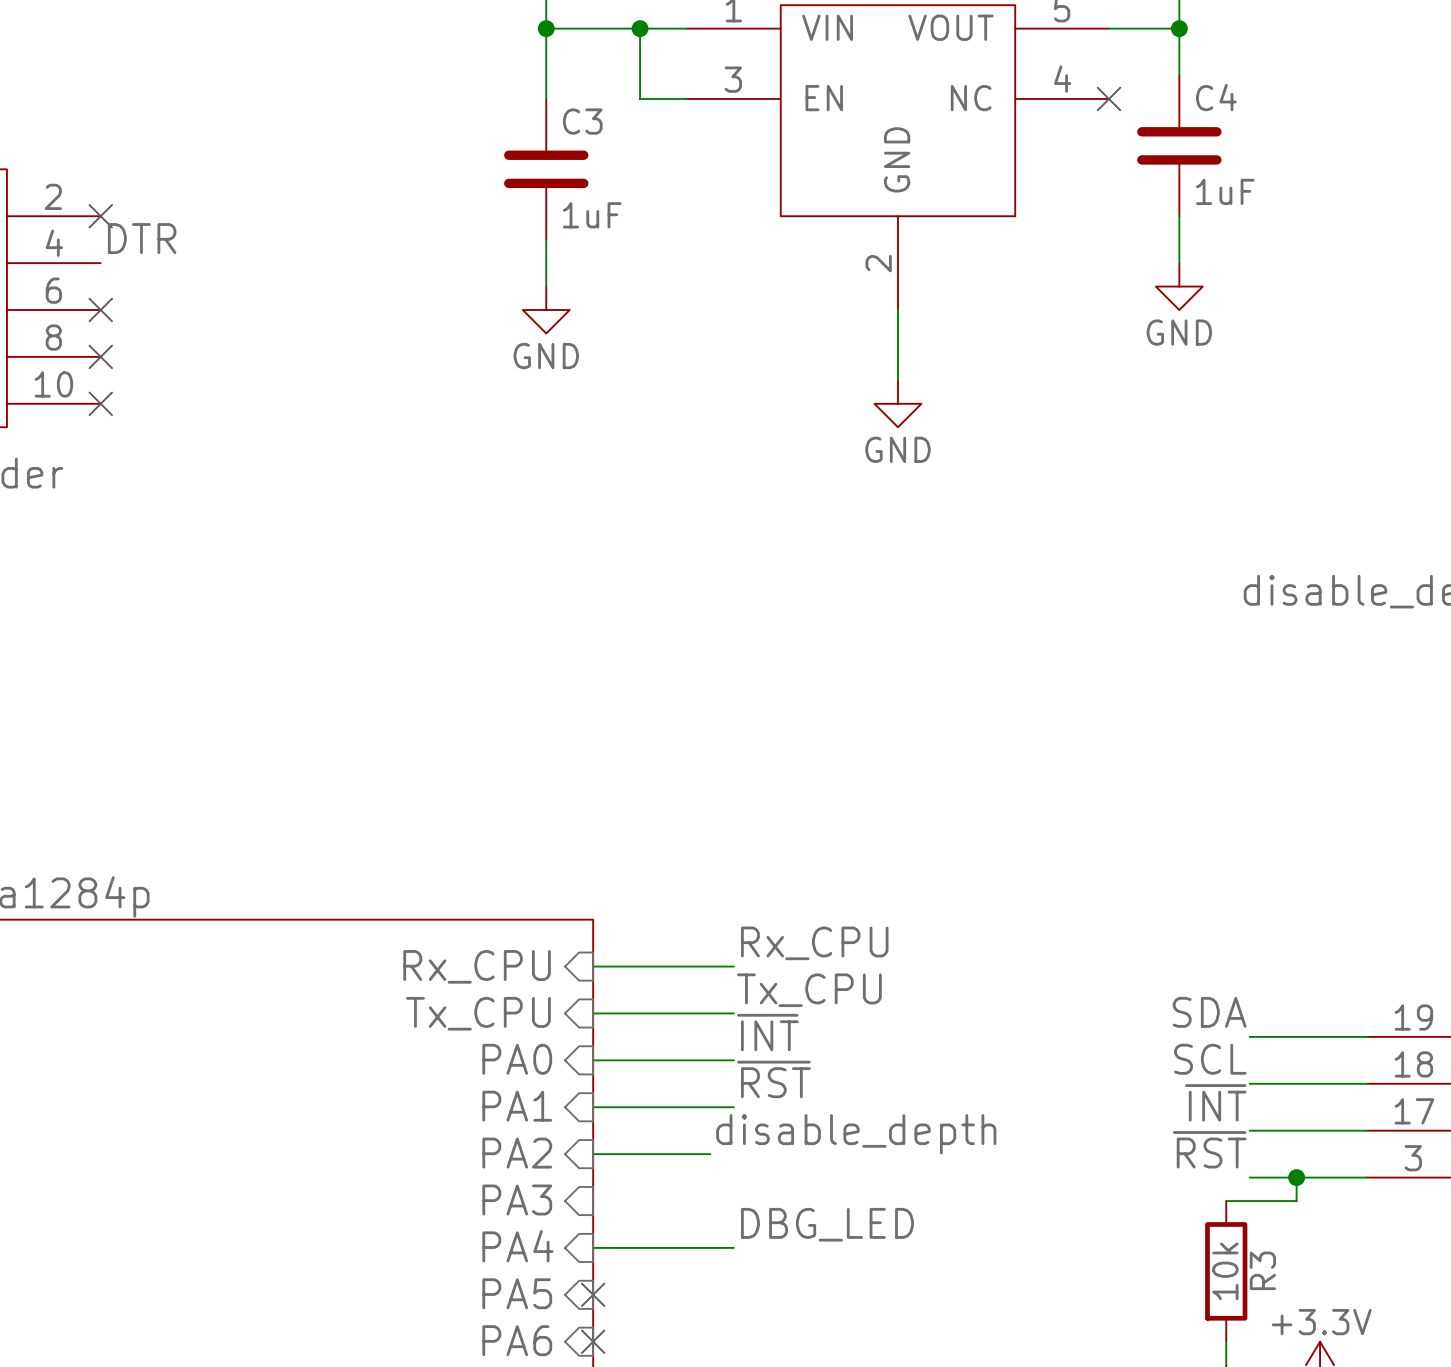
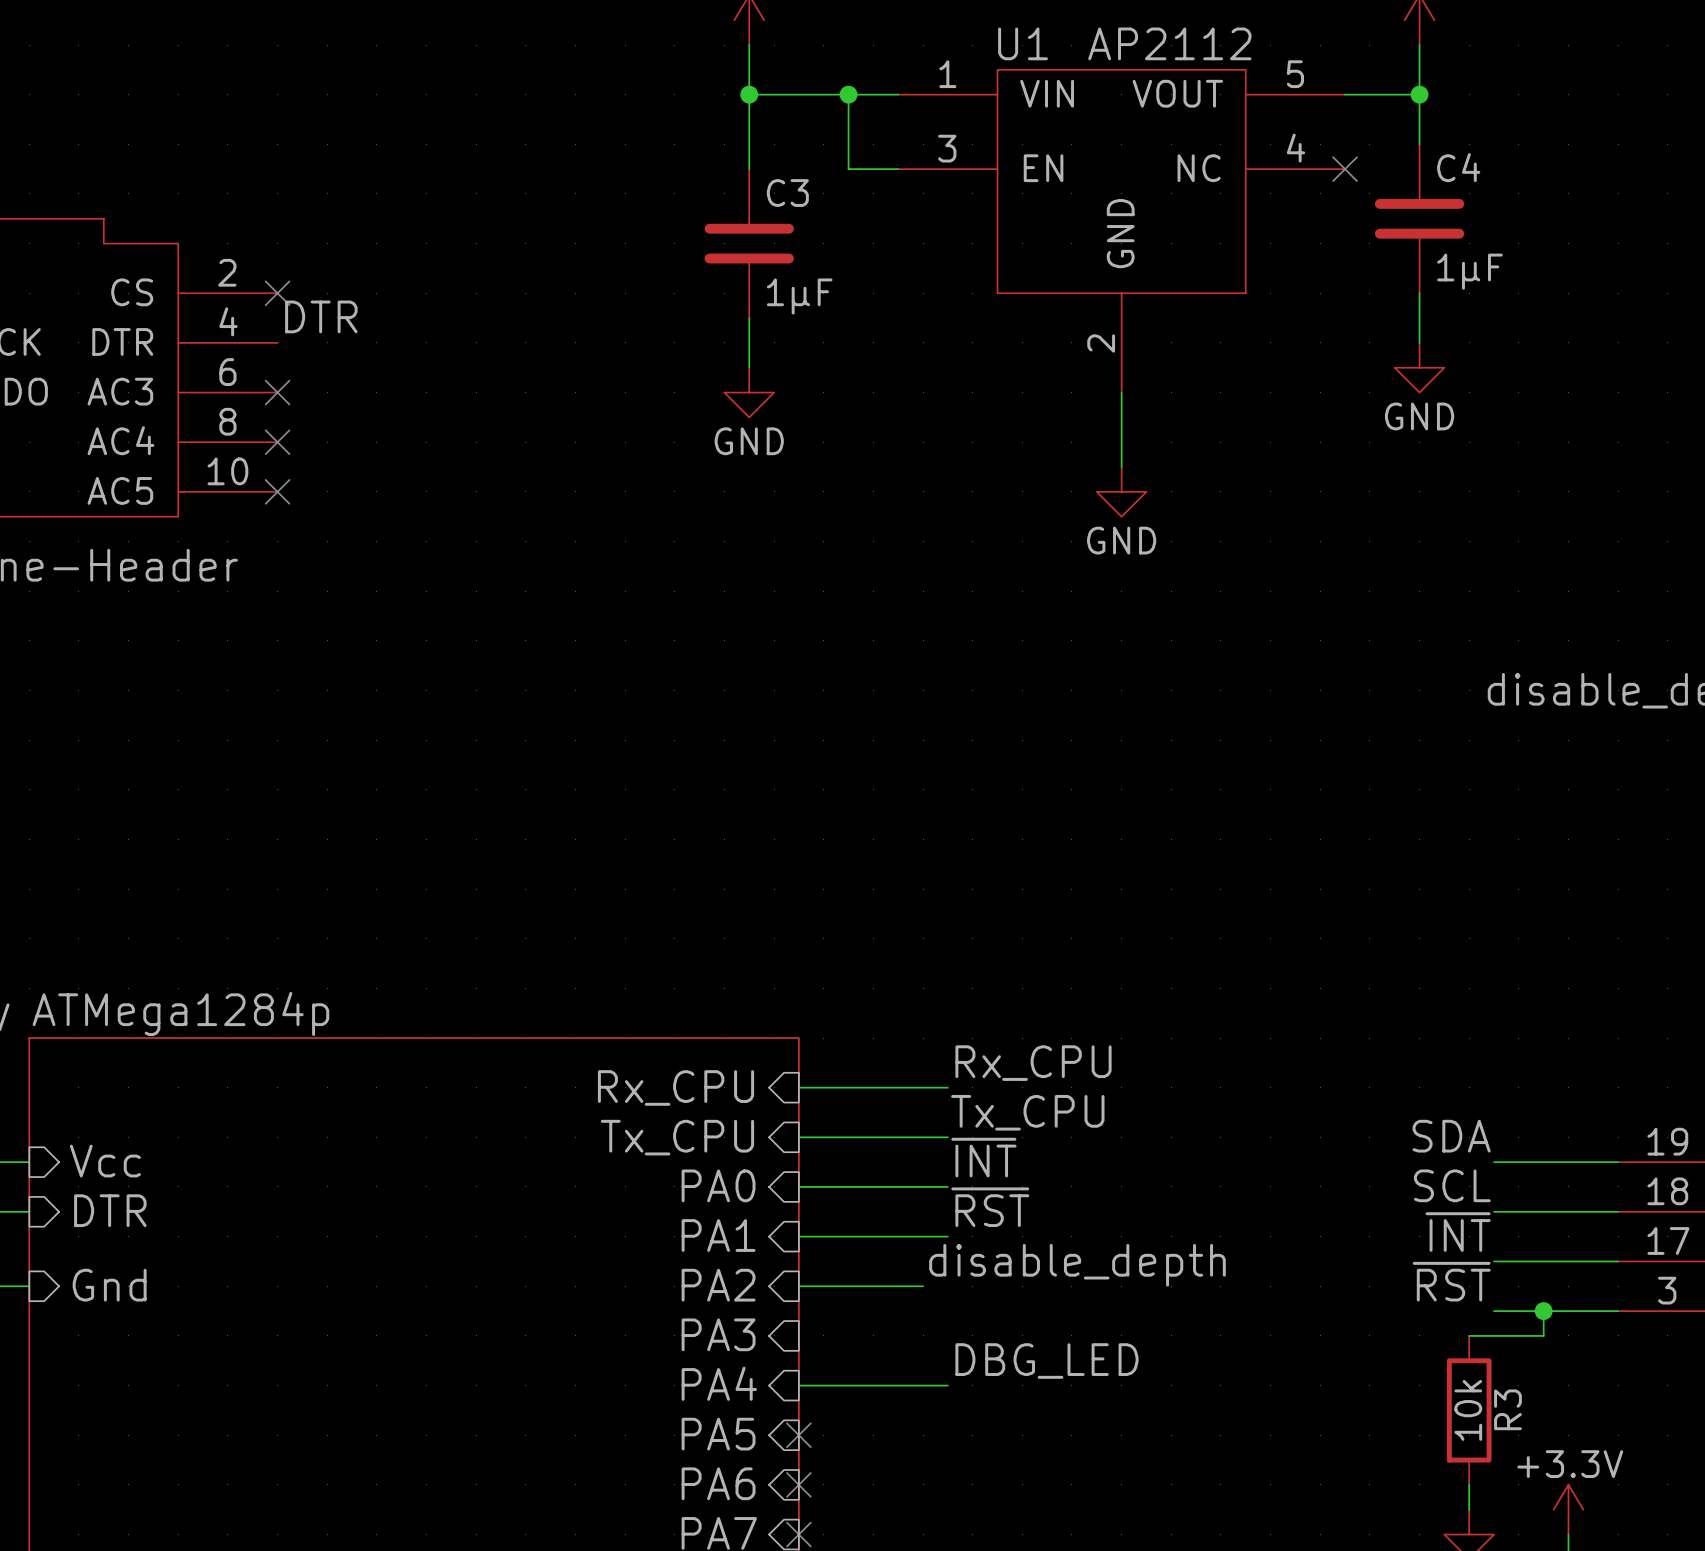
C4 value: 1uF (1225, 191) -> 1µF (1469, 271)
C3 value: 1uF (592, 215) -> 1µF (799, 296)

